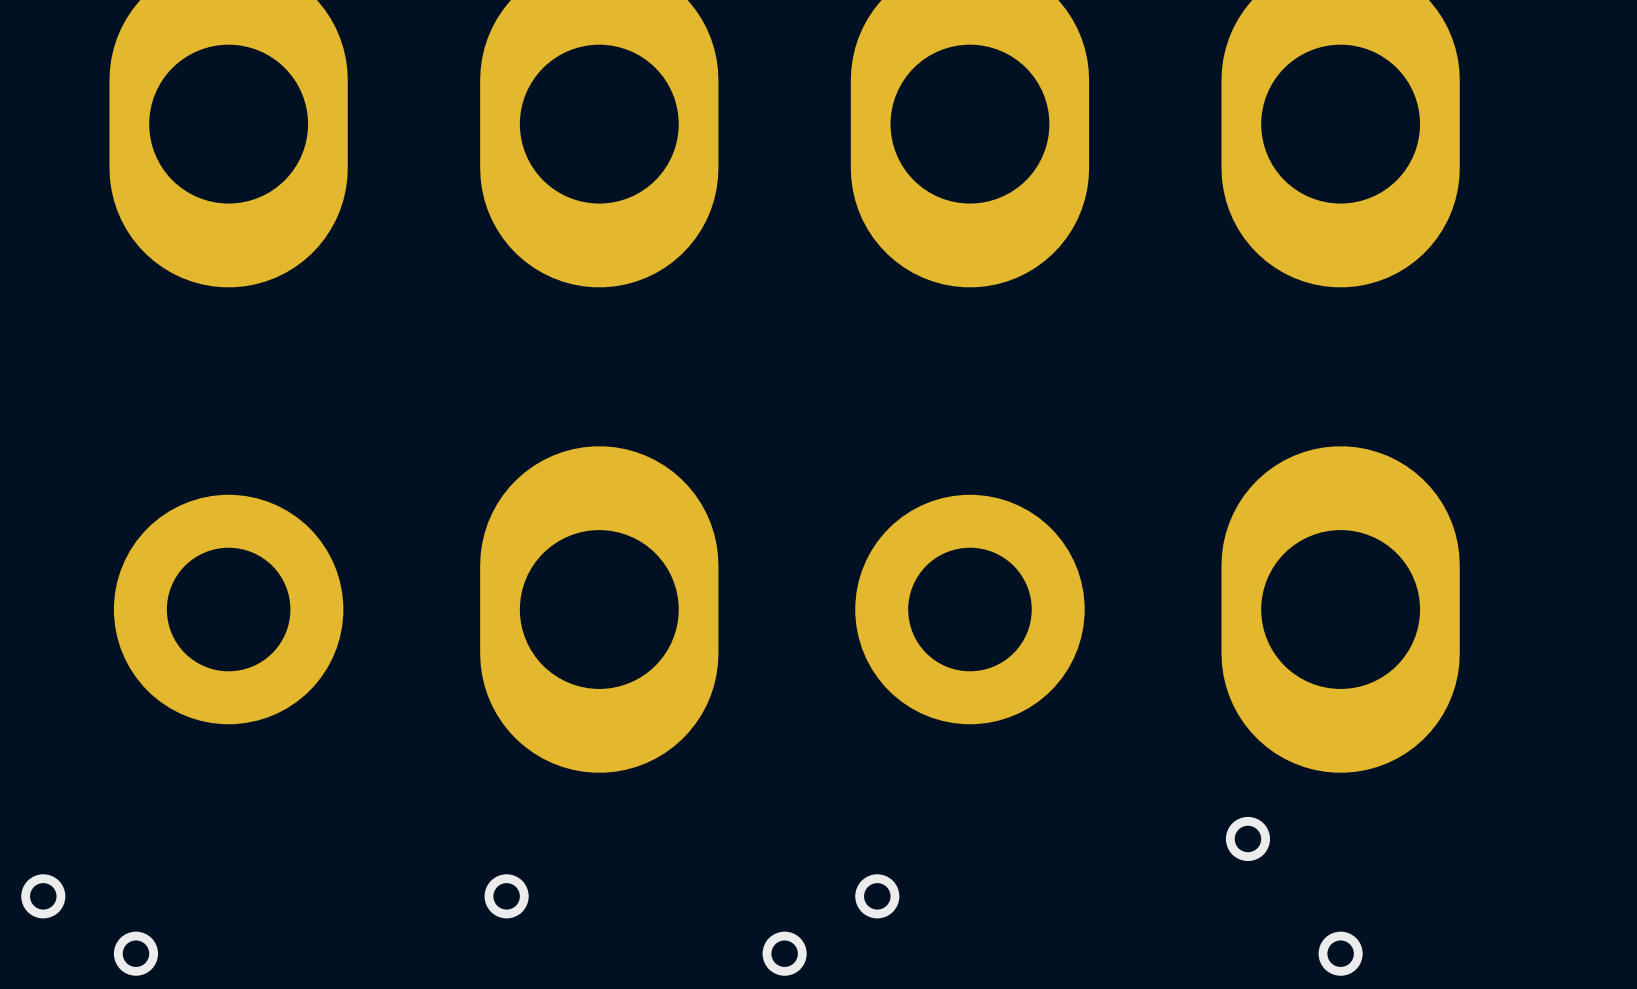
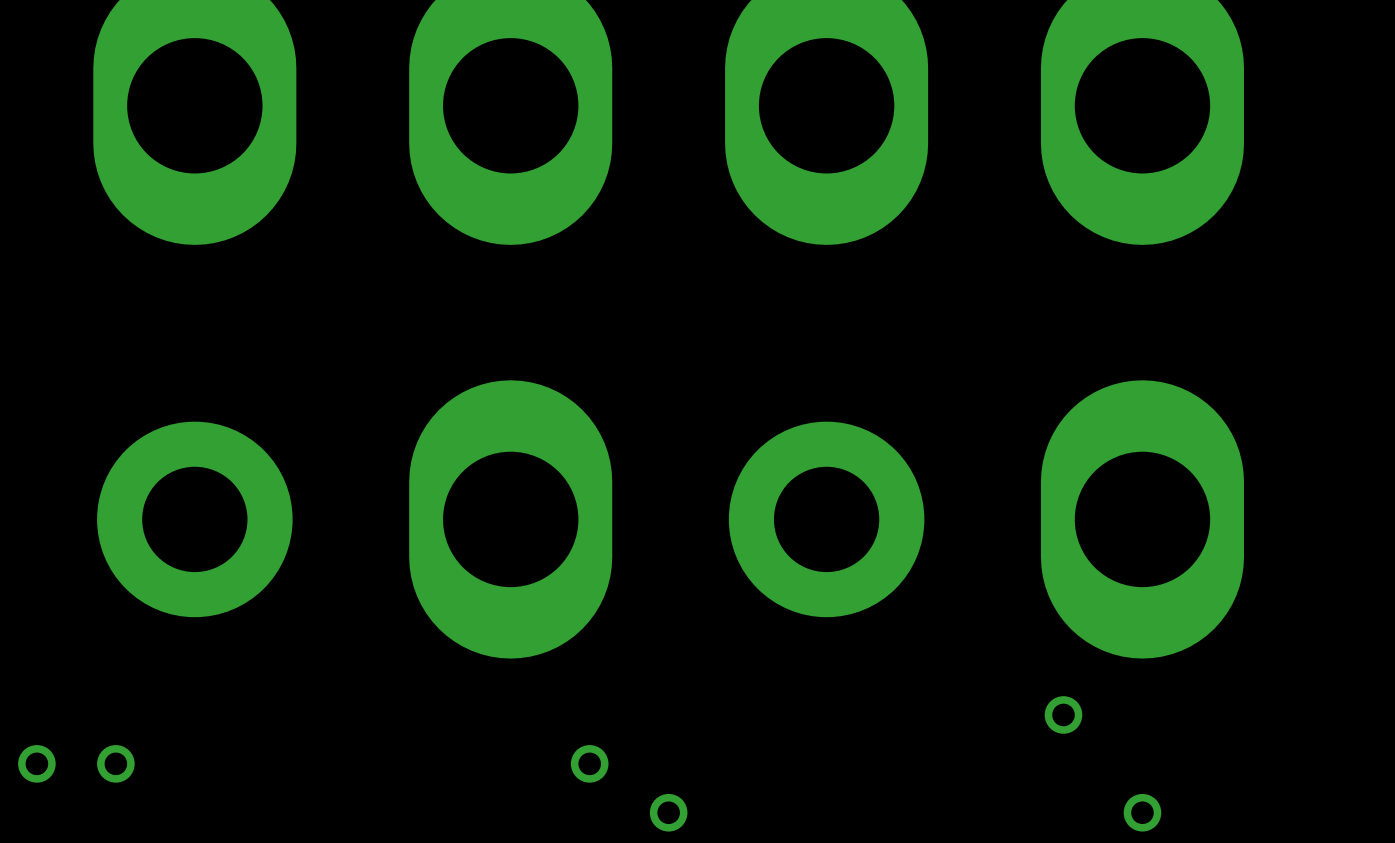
via: (506, 896) -> none
via: none -> (589, 763)
via: (877, 896) -> none
via position: (135, 953) -> (115, 763)

